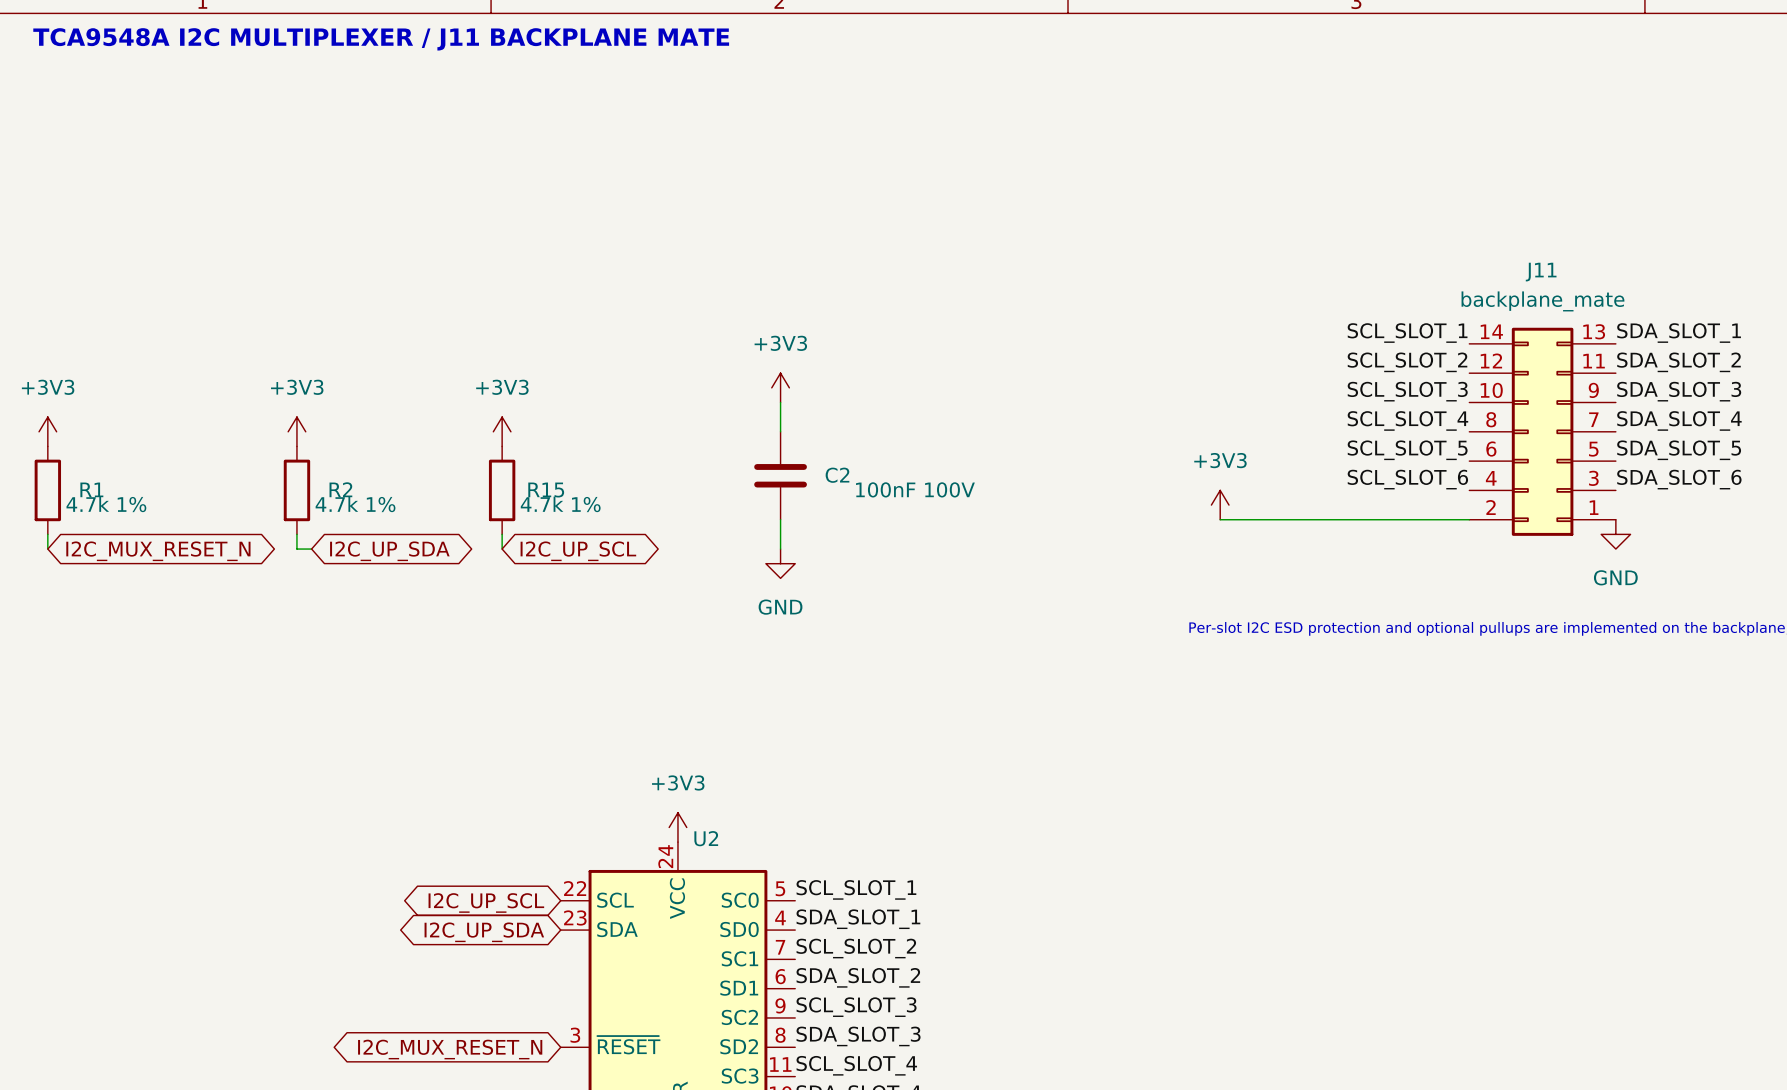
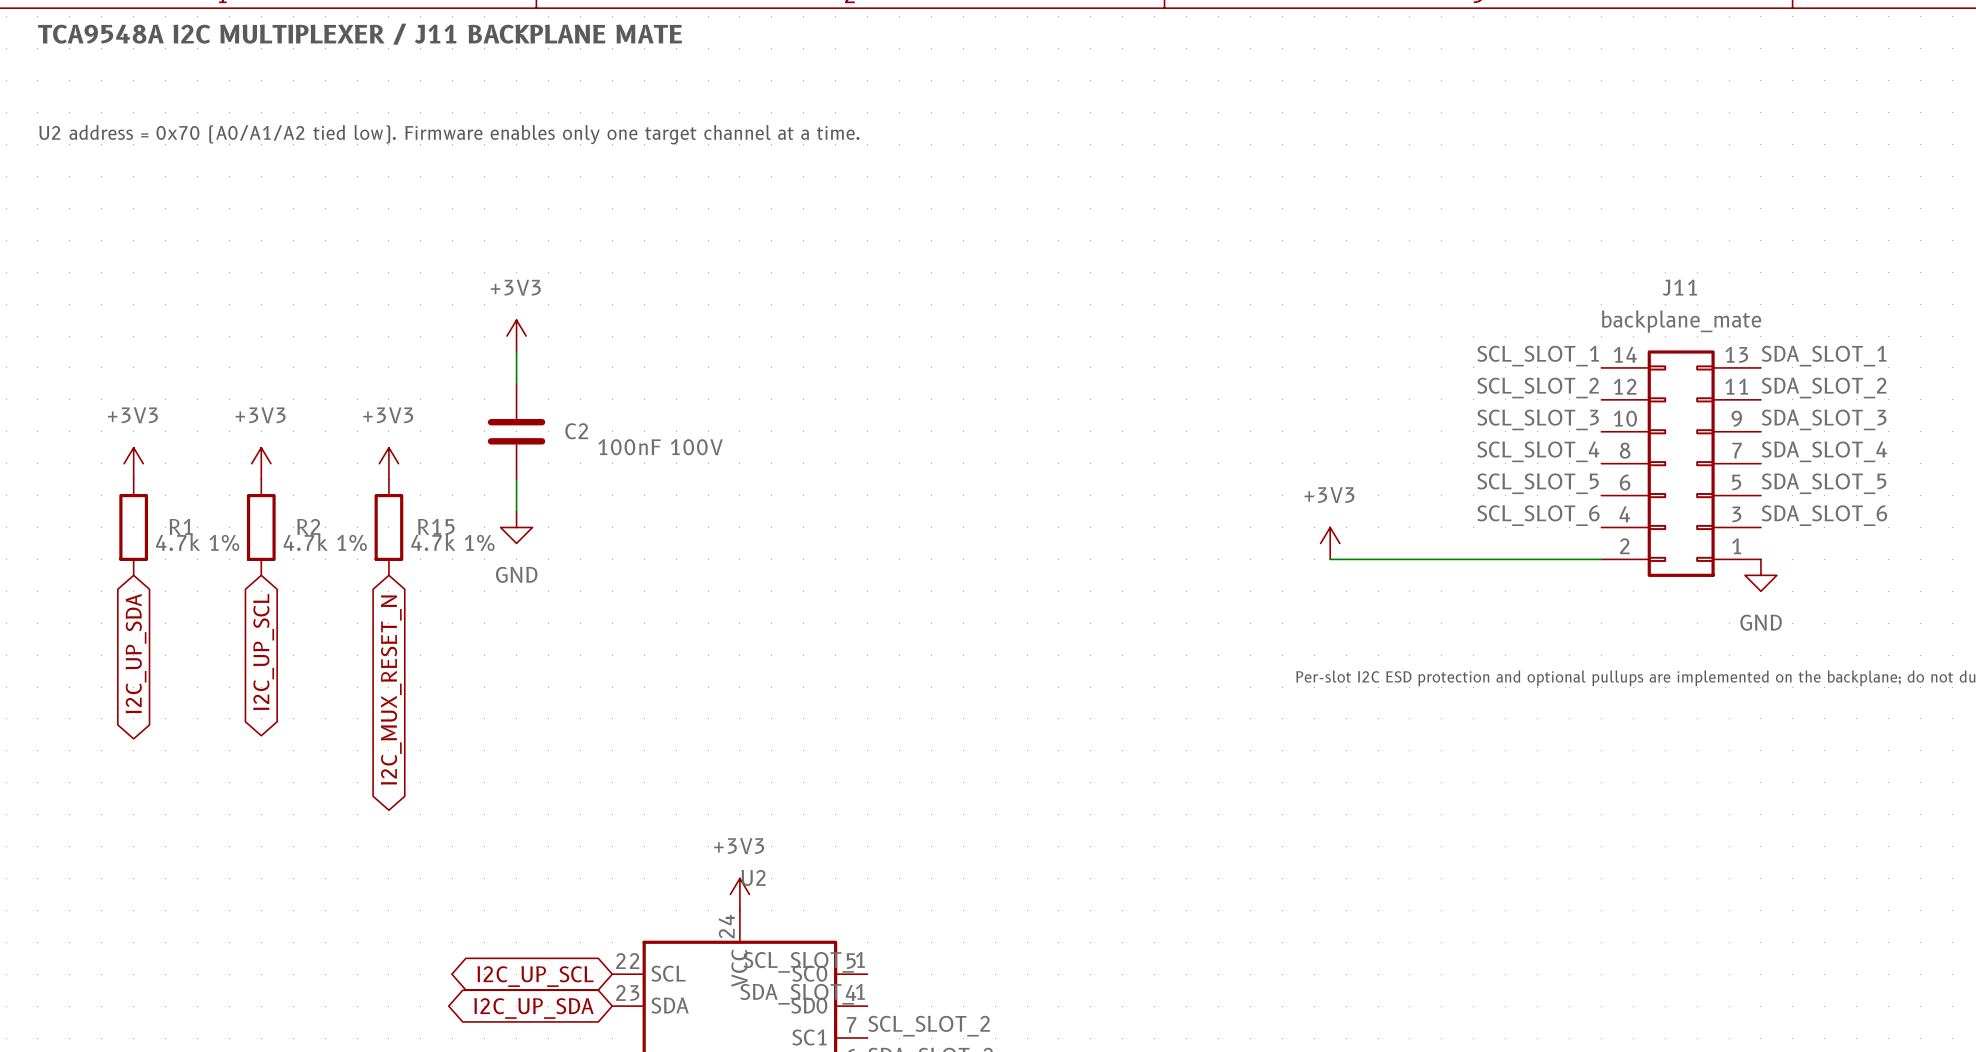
text: none -> U2 address = 0x70 (A0/A1/A2 tied low). Firmware enables only one target channel at a time. (449, 134)
power symbol: none -> +3V3 (516, 336)
wire: none -> (516, 351) (516, 383)
power symbol: +3V3 (780, 387) -> none
wire: (780, 402) (780, 431) -> none
power symbol position: +3V3 (47, 431) -> +3V3 (133, 463)
power symbol: none -> +3V3 (261, 463)
power symbol: +3V3 (296, 431) -> none
power symbol: none -> +3V3 (388, 463)
power symbol: +3V3 (502, 431) -> none
wire: none -> (516, 479) (516, 511)
C2 position: (780, 475) -> (516, 431)
R1 position: (47, 490) -> (133, 527)
R2 position: (296, 490) -> (261, 527)
power symbol: none -> GND (516, 527)
R15 position: (502, 490) -> (388, 527)
wire: (780, 519) (780, 549) -> none
wire: (47, 534) (47, 549) -> none
wire: (296, 534) (296, 549) (311, 549) -> none
wire: (502, 534) (502, 549) -> none
global label: I2C_MUX_RESET_N (158, 551) -> none
global label rotation: 0° (389, 551) -> 90° clockwise (136, 653)
global label position: I2C_UP_SDA (389, 551) -> I2C_UP_SDA (136, 653)
global label rotation: 0° (578, 551) -> 90° clockwise (263, 652)
global label position: I2C_UP_SCL (578, 551) -> I2C_UP_SCL (263, 652)
power symbol: GND (780, 563) -> none
global label: none -> I2C_MUX_RESET_N (391, 690)
U2 name position: U2 (706, 838) -> U2 (753, 877)
label position: SCL_SLOT_1 (856, 889) -> SCL_SLOT_1 (804, 962)
label position: SDA_SLOT_1 (858, 919) -> SDA_SLOT_1 (802, 994)

